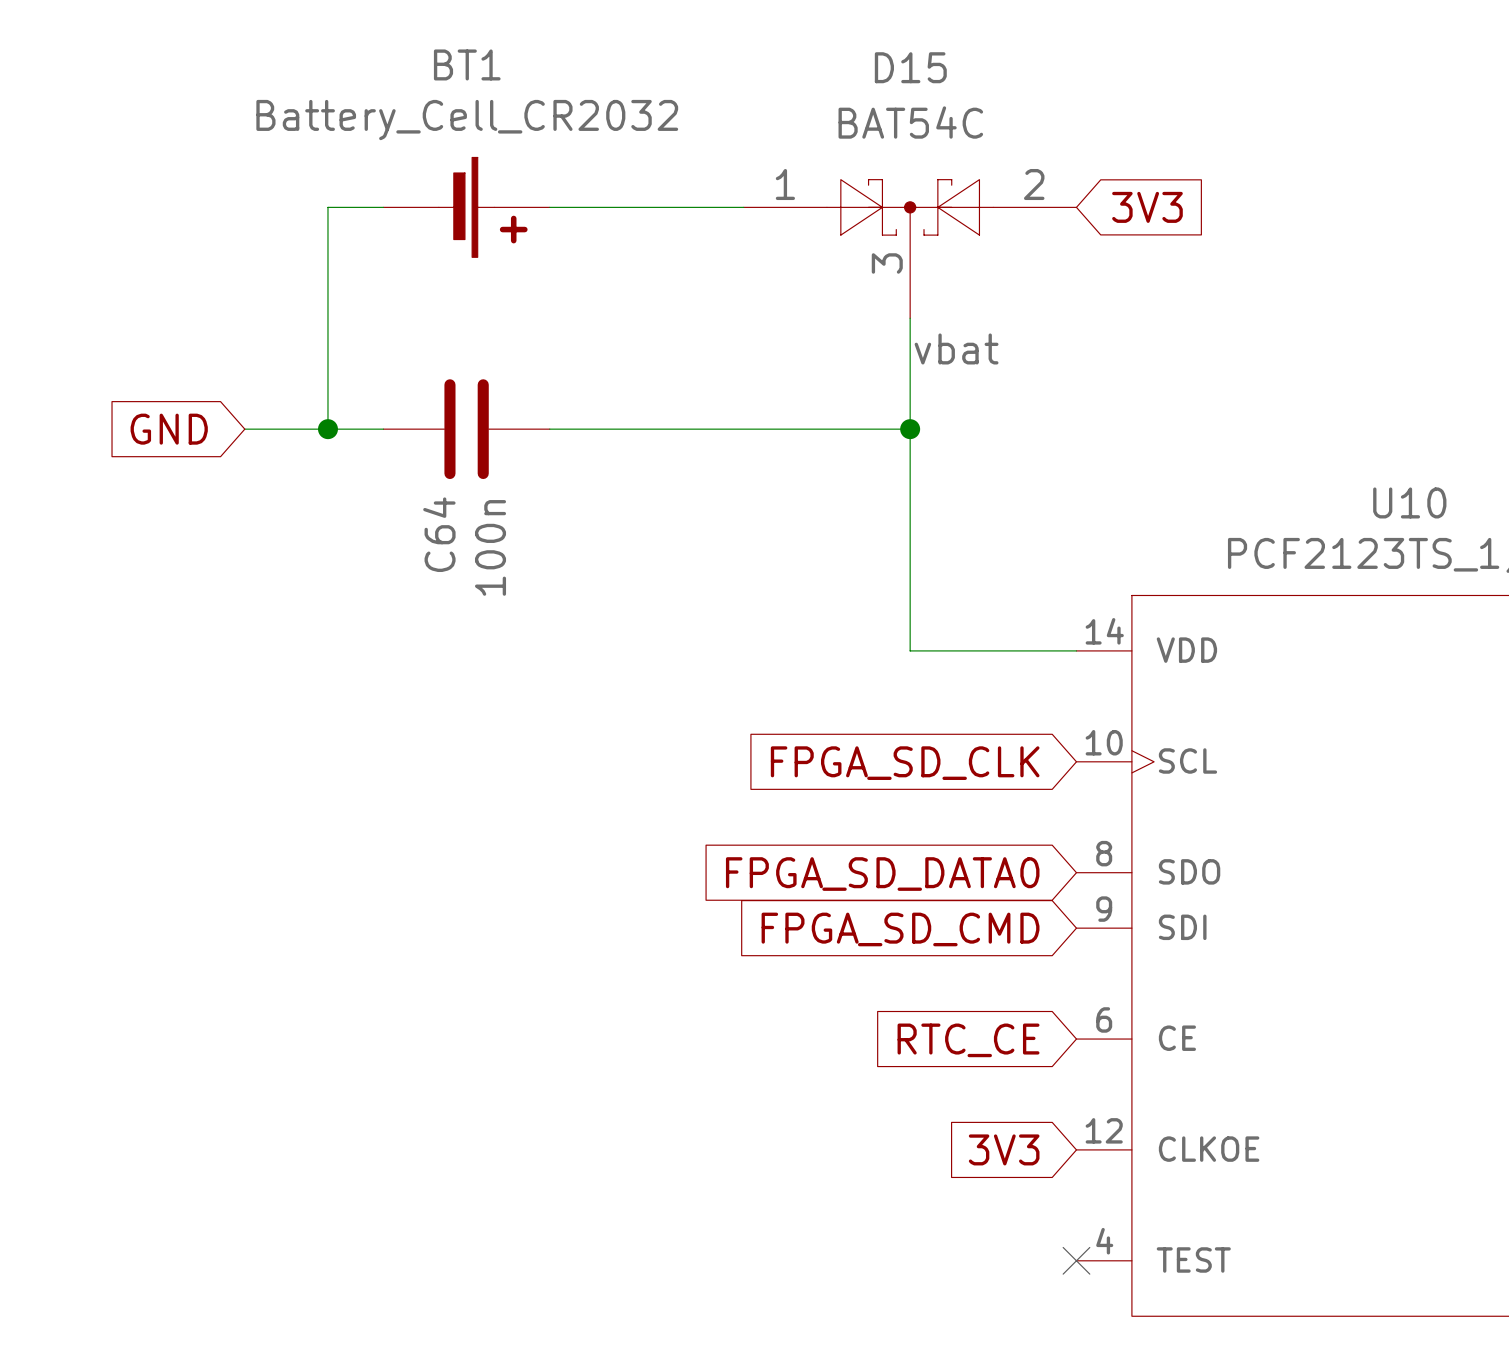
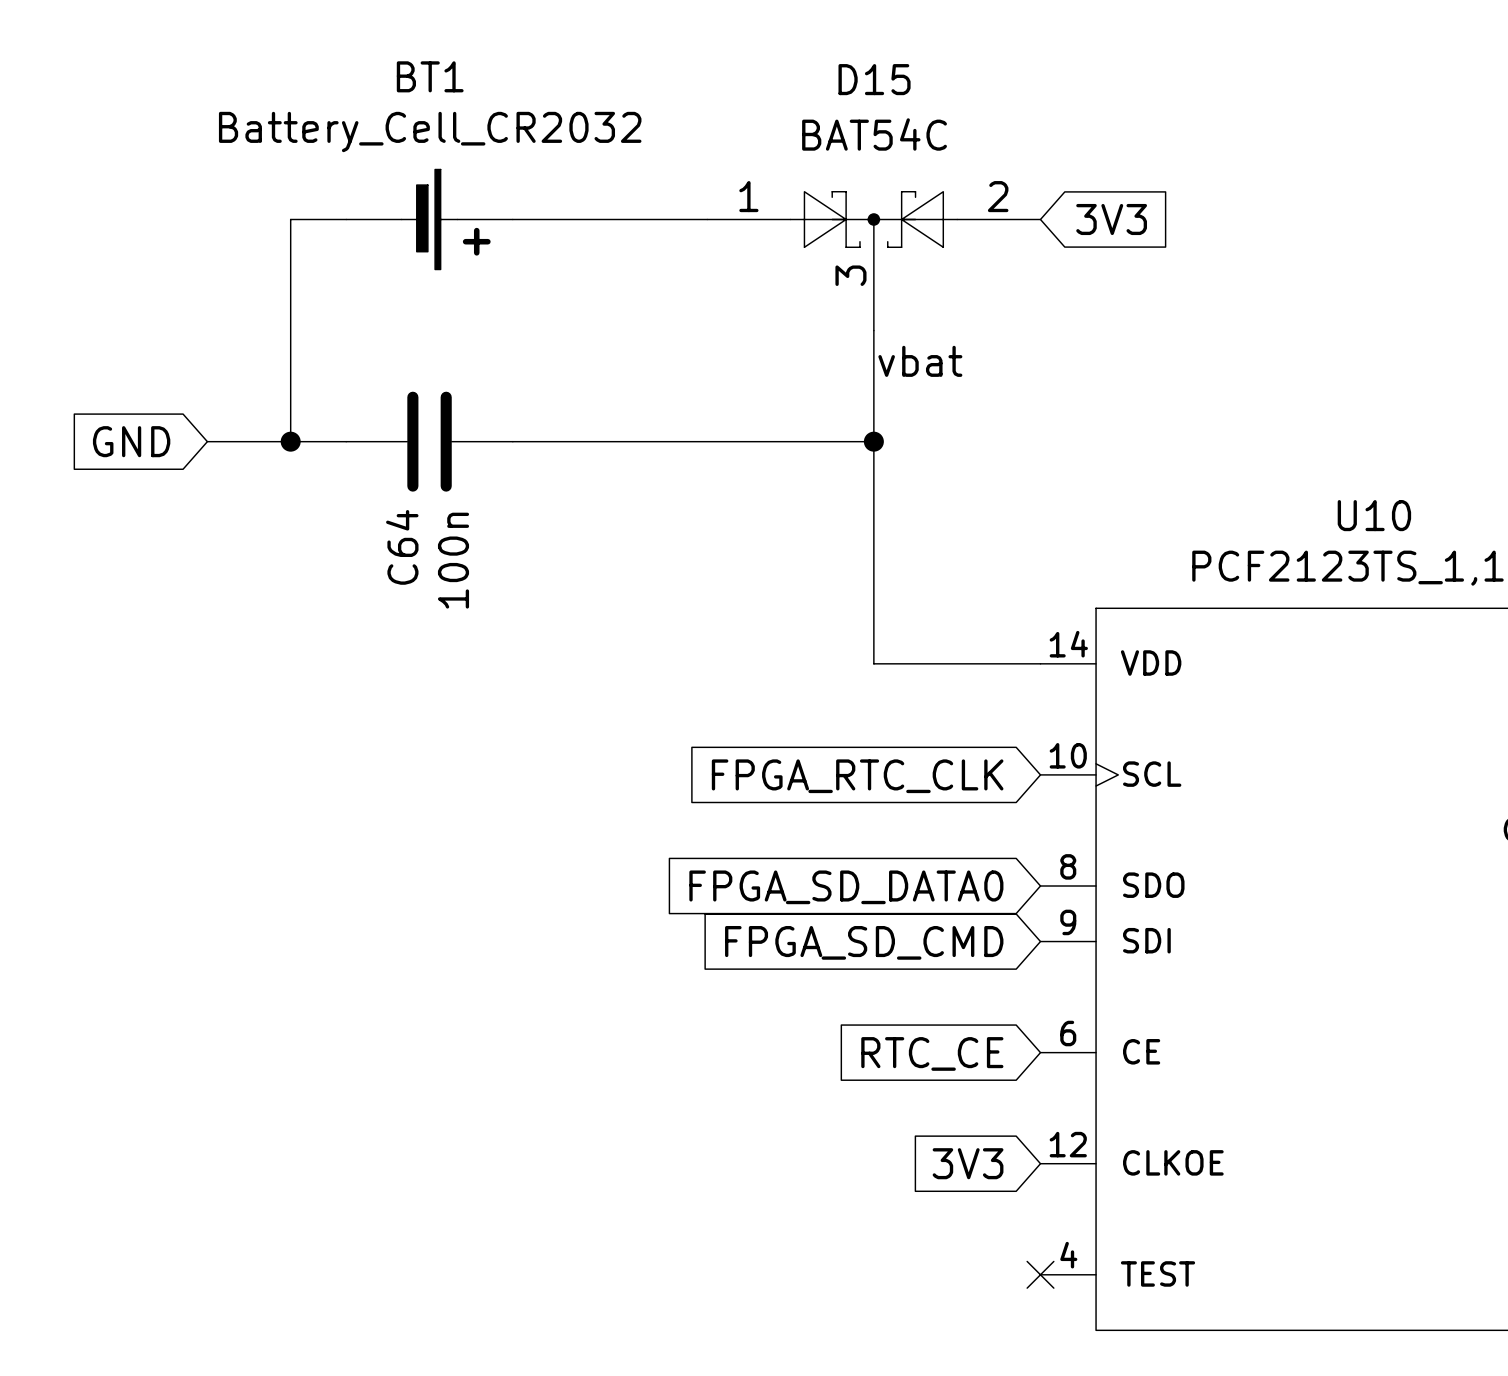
global label: FPGA_SD_CLK (905, 763) -> FPGA_RTC_CLK (857, 776)

